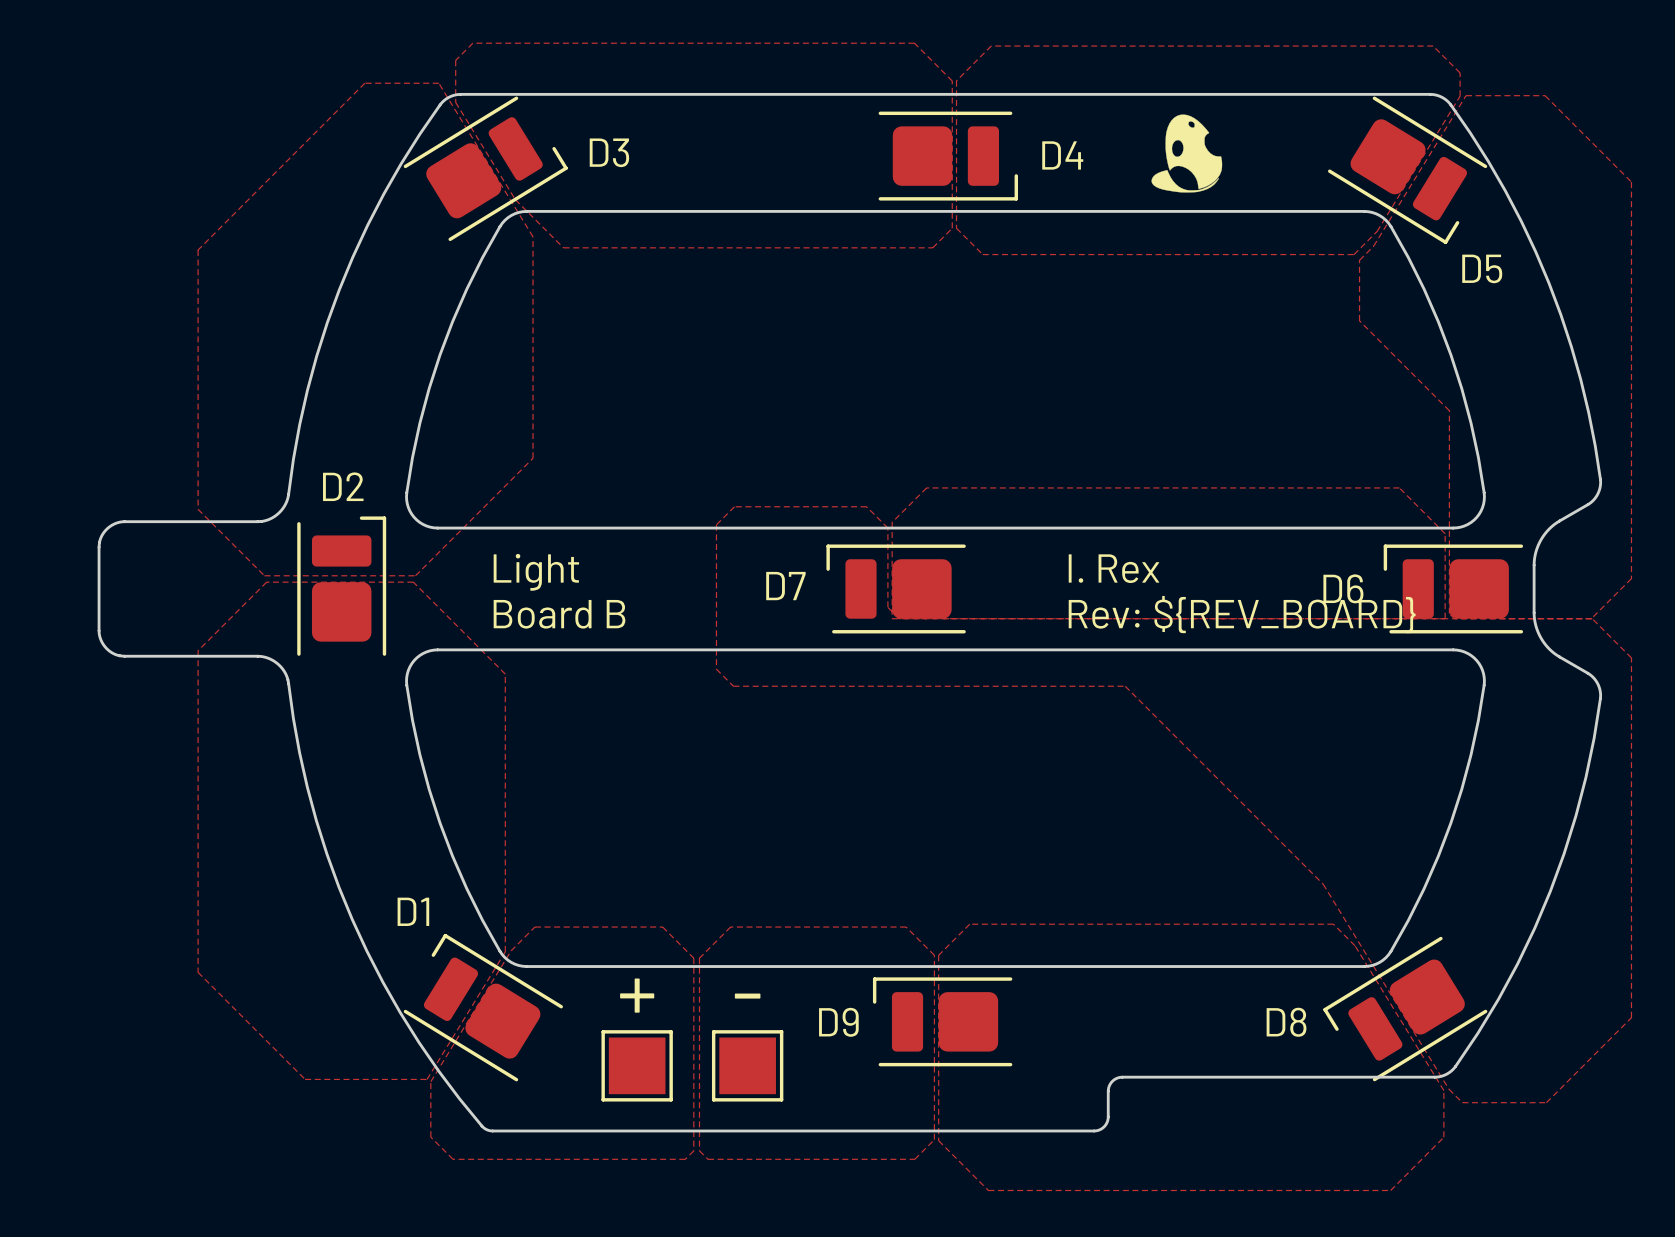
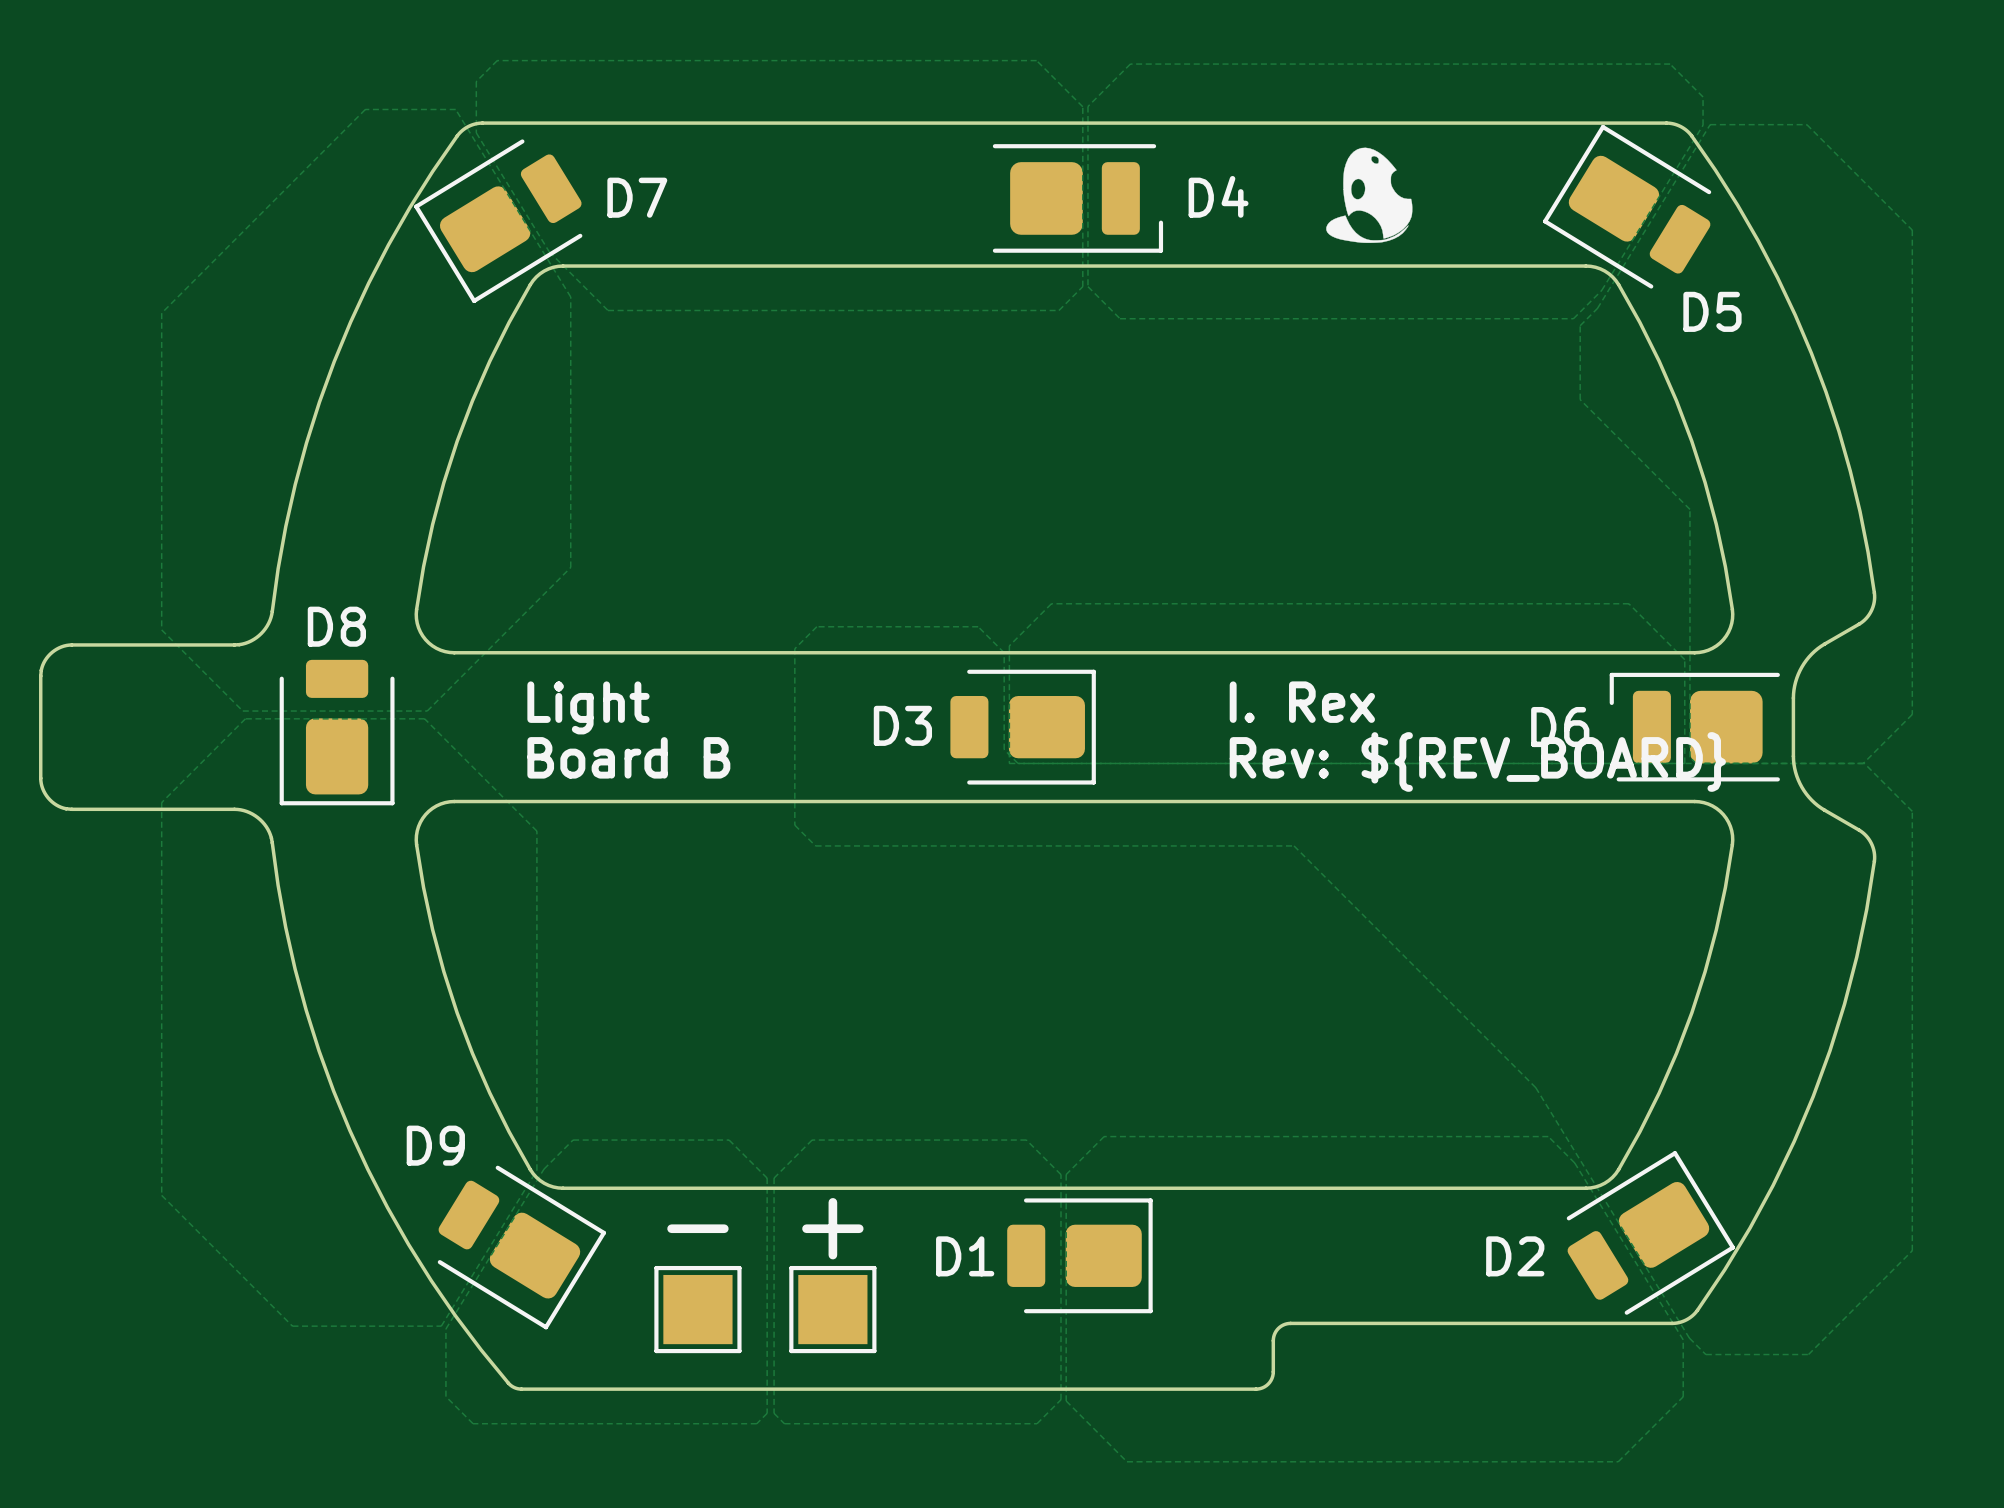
D3 footprint: [403, 96, 568, 242] -> [950, 669, 1096, 785]
D5 footprint: [1328, 96, 1488, 245] -> [1543, 124, 1712, 289]
D3 name position: D3 (609, 152) -> D3 (902, 725)
D2 name position: D2 (343, 486) -> D2 (1515, 1256)
D2 footprint: [297, 516, 387, 656] -> [1566, 1151, 1735, 1315]
D7 footprint: [826, 544, 966, 634] -> [414, 139, 583, 304]
D7 name position: D7 (785, 586) -> D7 (637, 197)
D1 name position: D1 (413, 911) -> D1 (965, 1256)
D1 footprint: [403, 933, 563, 1082] -> [1007, 1198, 1153, 1314]
D8 footprint: [1323, 936, 1488, 1082] -> [279, 659, 395, 806]
D9 footprint: [872, 977, 1013, 1067] -> [437, 1165, 606, 1330]
text: + (637, 995) -> - (697, 1228)
text: - (747, 996) -> + (832, 1228)
D9 name position: D9 (838, 1022) -> D9 (435, 1145)
D8 name position: D8 (1286, 1022) -> D8 (336, 626)

